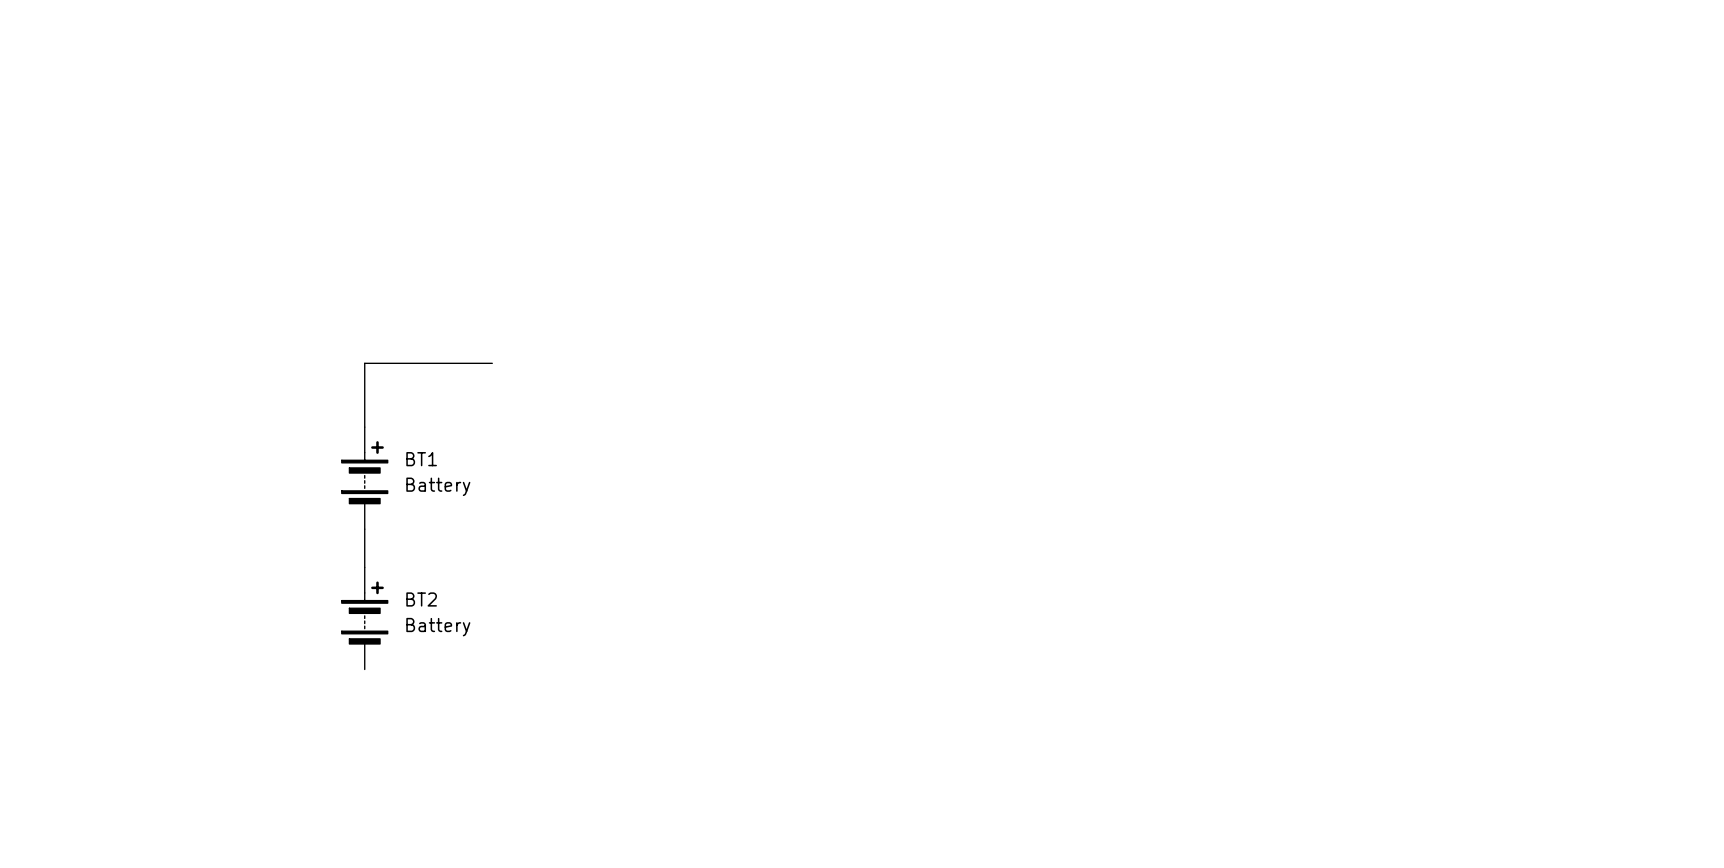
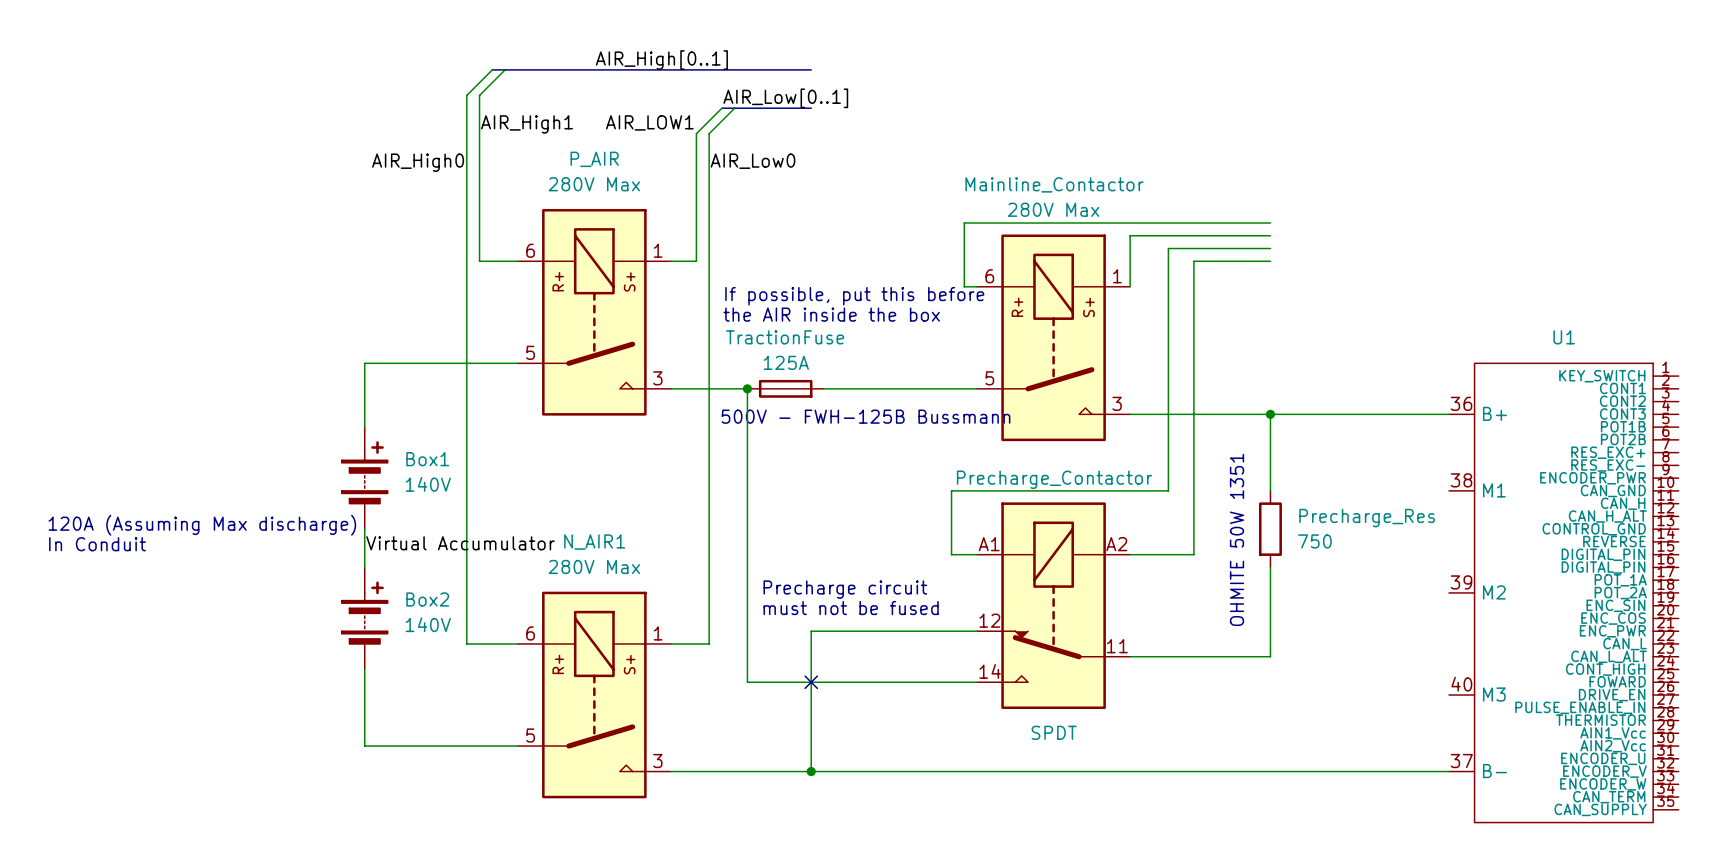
label: none -> AIR_High[0..1] (661, 60)
wire: none -> (492, 69) (466, 95) (466, 643) (517, 643)
bus: none -> (492, 69) (811, 69)
wire: none -> (505, 69) (479, 95) (479, 261) (517, 261)
label: none -> AIR_Low[0..1] (785, 98)
wire: none -> (721, 108) (696, 133) (696, 261) (670, 261)
bus: none -> (721, 108) (811, 108)
wire: none -> (734, 108) (709, 133) (709, 643) (670, 643)
label: none -> AIR_LOW1 (649, 122)
label: none -> AIR_High1 (527, 124)
label: none -> AIR_Low0 (752, 161)
label: none -> AIR_High0 (418, 162)
wire: none -> (1270, 223) (964, 223) (964, 286) (977, 286)
wire: none -> (1270, 235) (1130, 235) (1130, 286)
wire: none -> (1270, 248) (1168, 248) (1168, 490) (951, 490) (951, 554) (977, 554)
wire: none -> (1270, 261) (1193, 261) (1193, 554) (1130, 554)
text: none -> If possible, put this before (854, 296)
P_AIR: none -> 280V Max (594, 312)
text: none -> the AIR inside the box (831, 314)
Mainline_Contactor: none -> 280V Max (1053, 337)
wire: none -> (492, 363) (517, 363)
wire: none -> (670, 388) (747, 388) (747, 682) (977, 682)
junction: none -> (747, 388)
TractionFuse: none -> 125A (785, 388)
wire: none -> (823, 388) (977, 388)
wire: none -> (1130, 414) (1449, 414)
wire: none -> (1270, 414) (1270, 490)
junction: none -> (1270, 414)
text: none -> 500V - FWH-125B Bussmann (865, 416)
BT1 name: BT1 (421, 459) -> Box1 (427, 459)
BT1 value: Battery (438, 486) -> 140V (428, 484)
text: none -> 120A (Assuming Max discharge) (202, 525)
Precharge_Res: none -> 750 (1270, 529)
text: none -> OHMITE 50W 1351 (1237, 539)
label: none -> Virtual Accumulator (460, 543)
text: none -> In Conduit (97, 544)
wire: none -> (1270, 567) (1270, 656) (1130, 656)
text: none -> Precharge circuit (845, 589)
U1: none -> (1563, 592)
BT2 name: BT2 (421, 599) -> Box2 (427, 599)
Precharge_Contactor: none -> SPDT (1053, 605)
text: none -> must not be fused (851, 608)
BT2 value: Battery (438, 627) -> 140V (428, 624)
wire: none -> (977, 631) (811, 631) (811, 771)
wire: none -> (364, 669) (364, 746) (517, 746)
no-connect mark: none -> (811, 682)
N_AIR1: none -> 280V Max (594, 695)
wire: none -> (670, 771) (1449, 771)
junction: none -> (811, 771)

